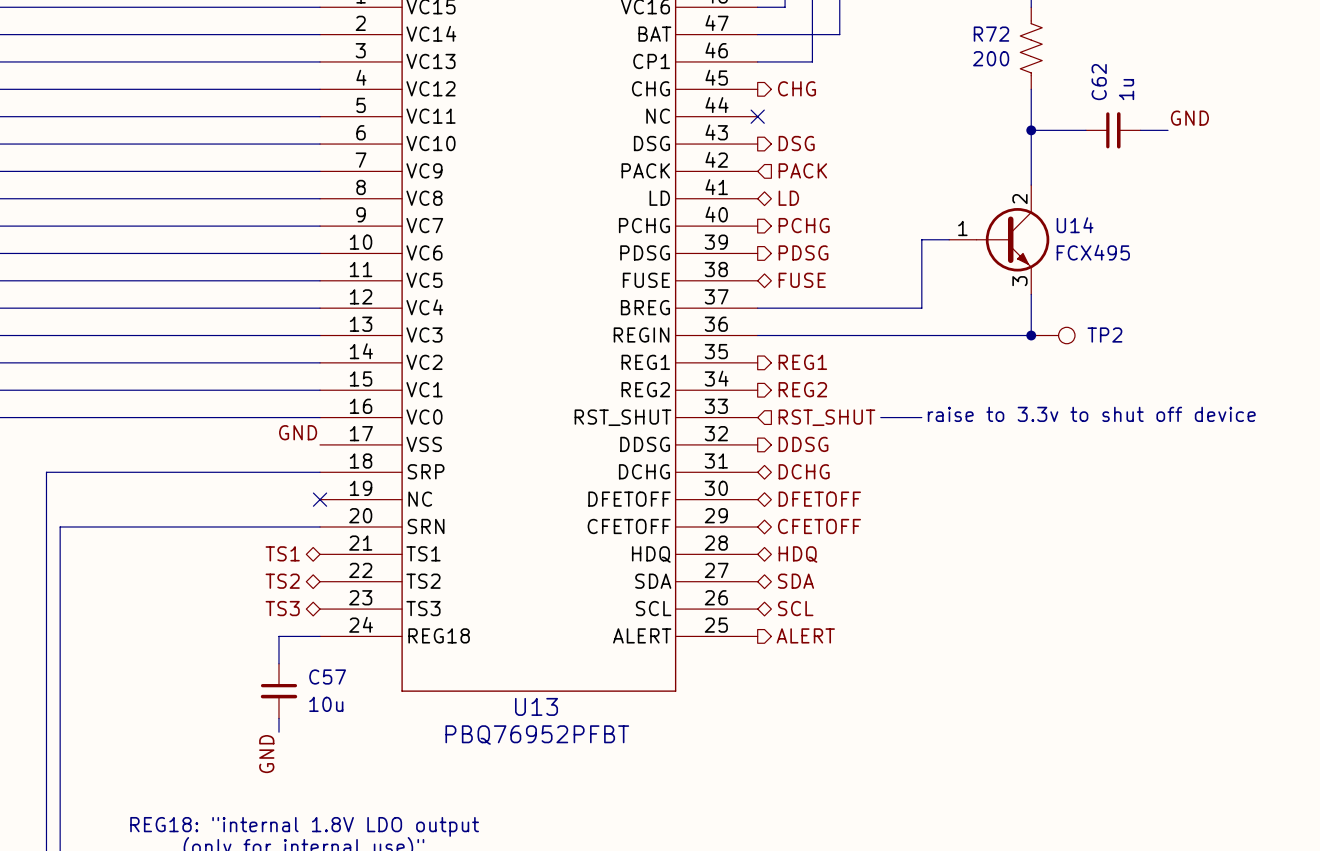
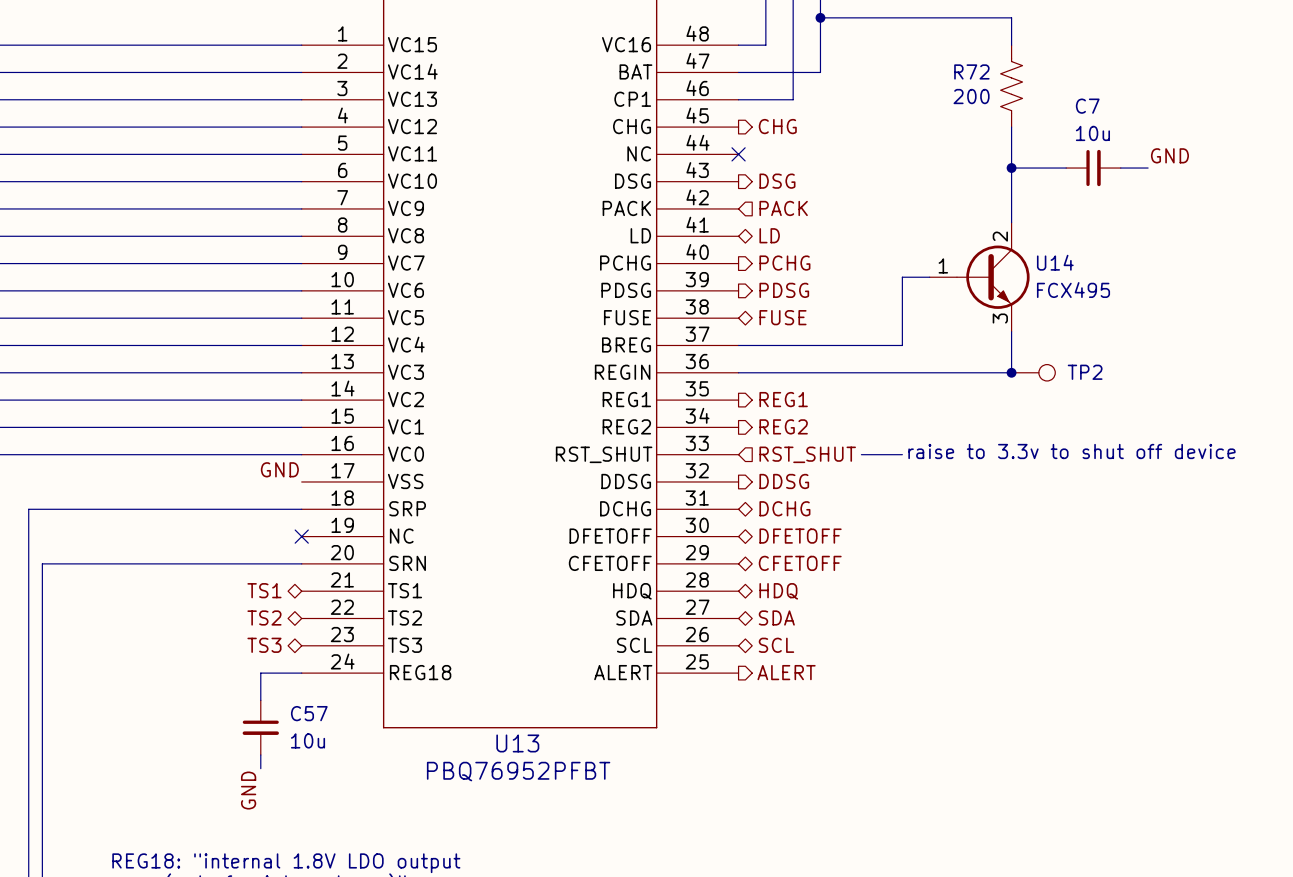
C62 name: C62 (1099, 82) -> C7 (1087, 106)
C62 value: 1u (1126, 89) -> 10u (1092, 133)

